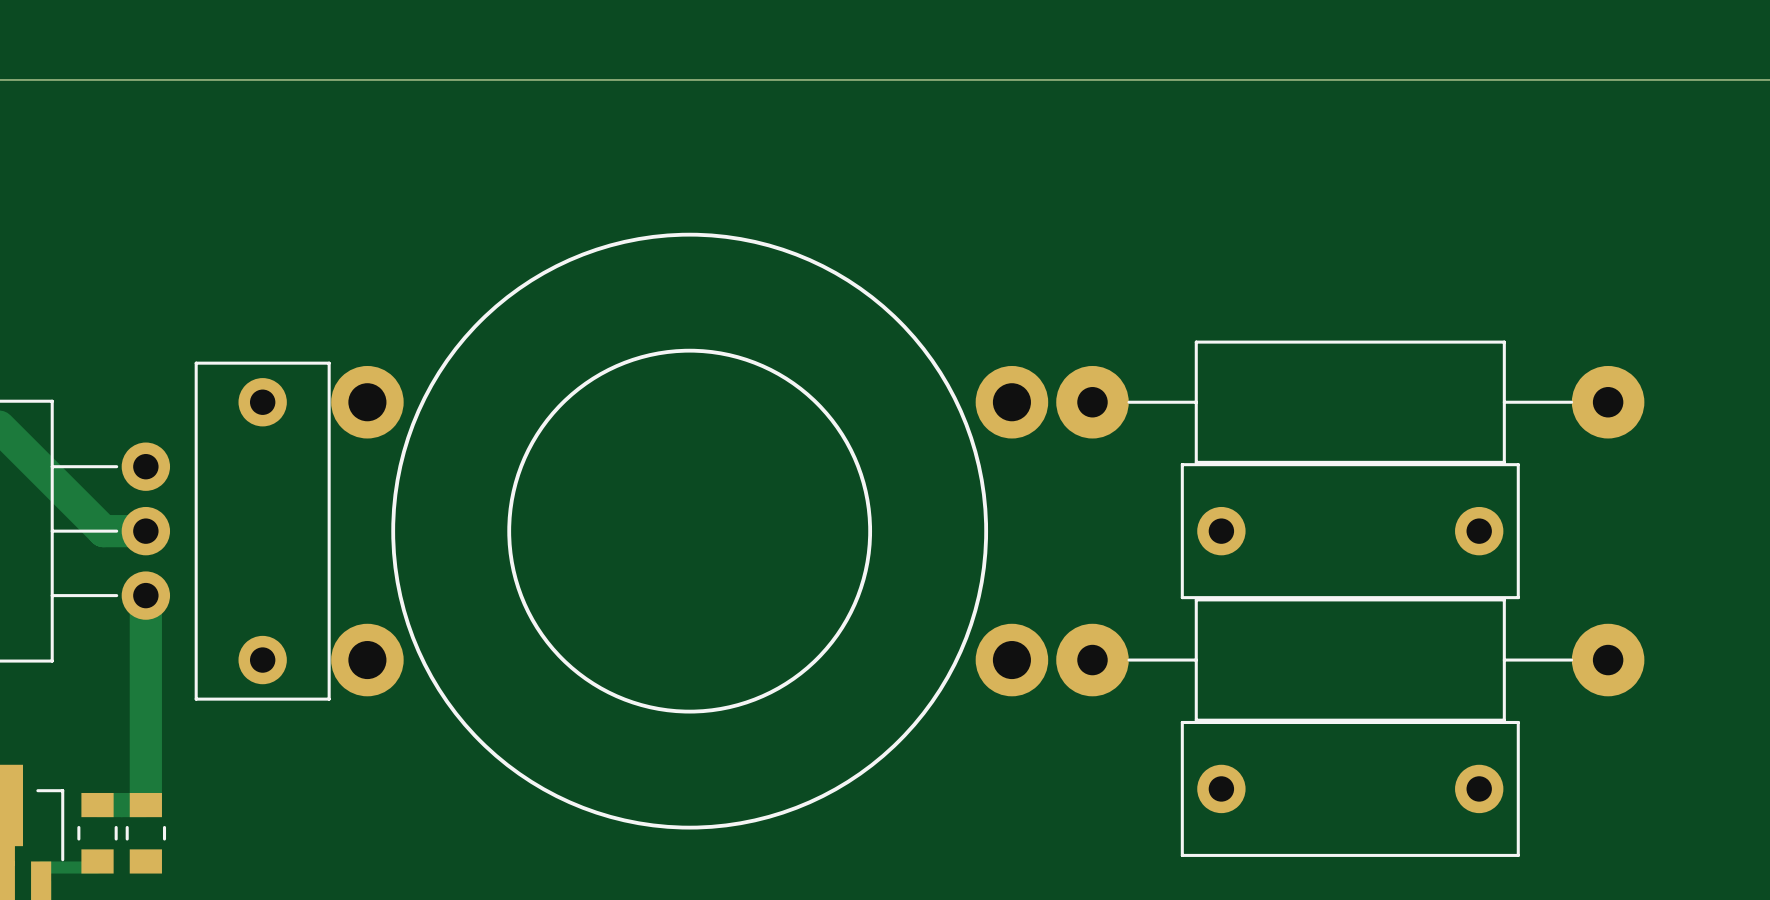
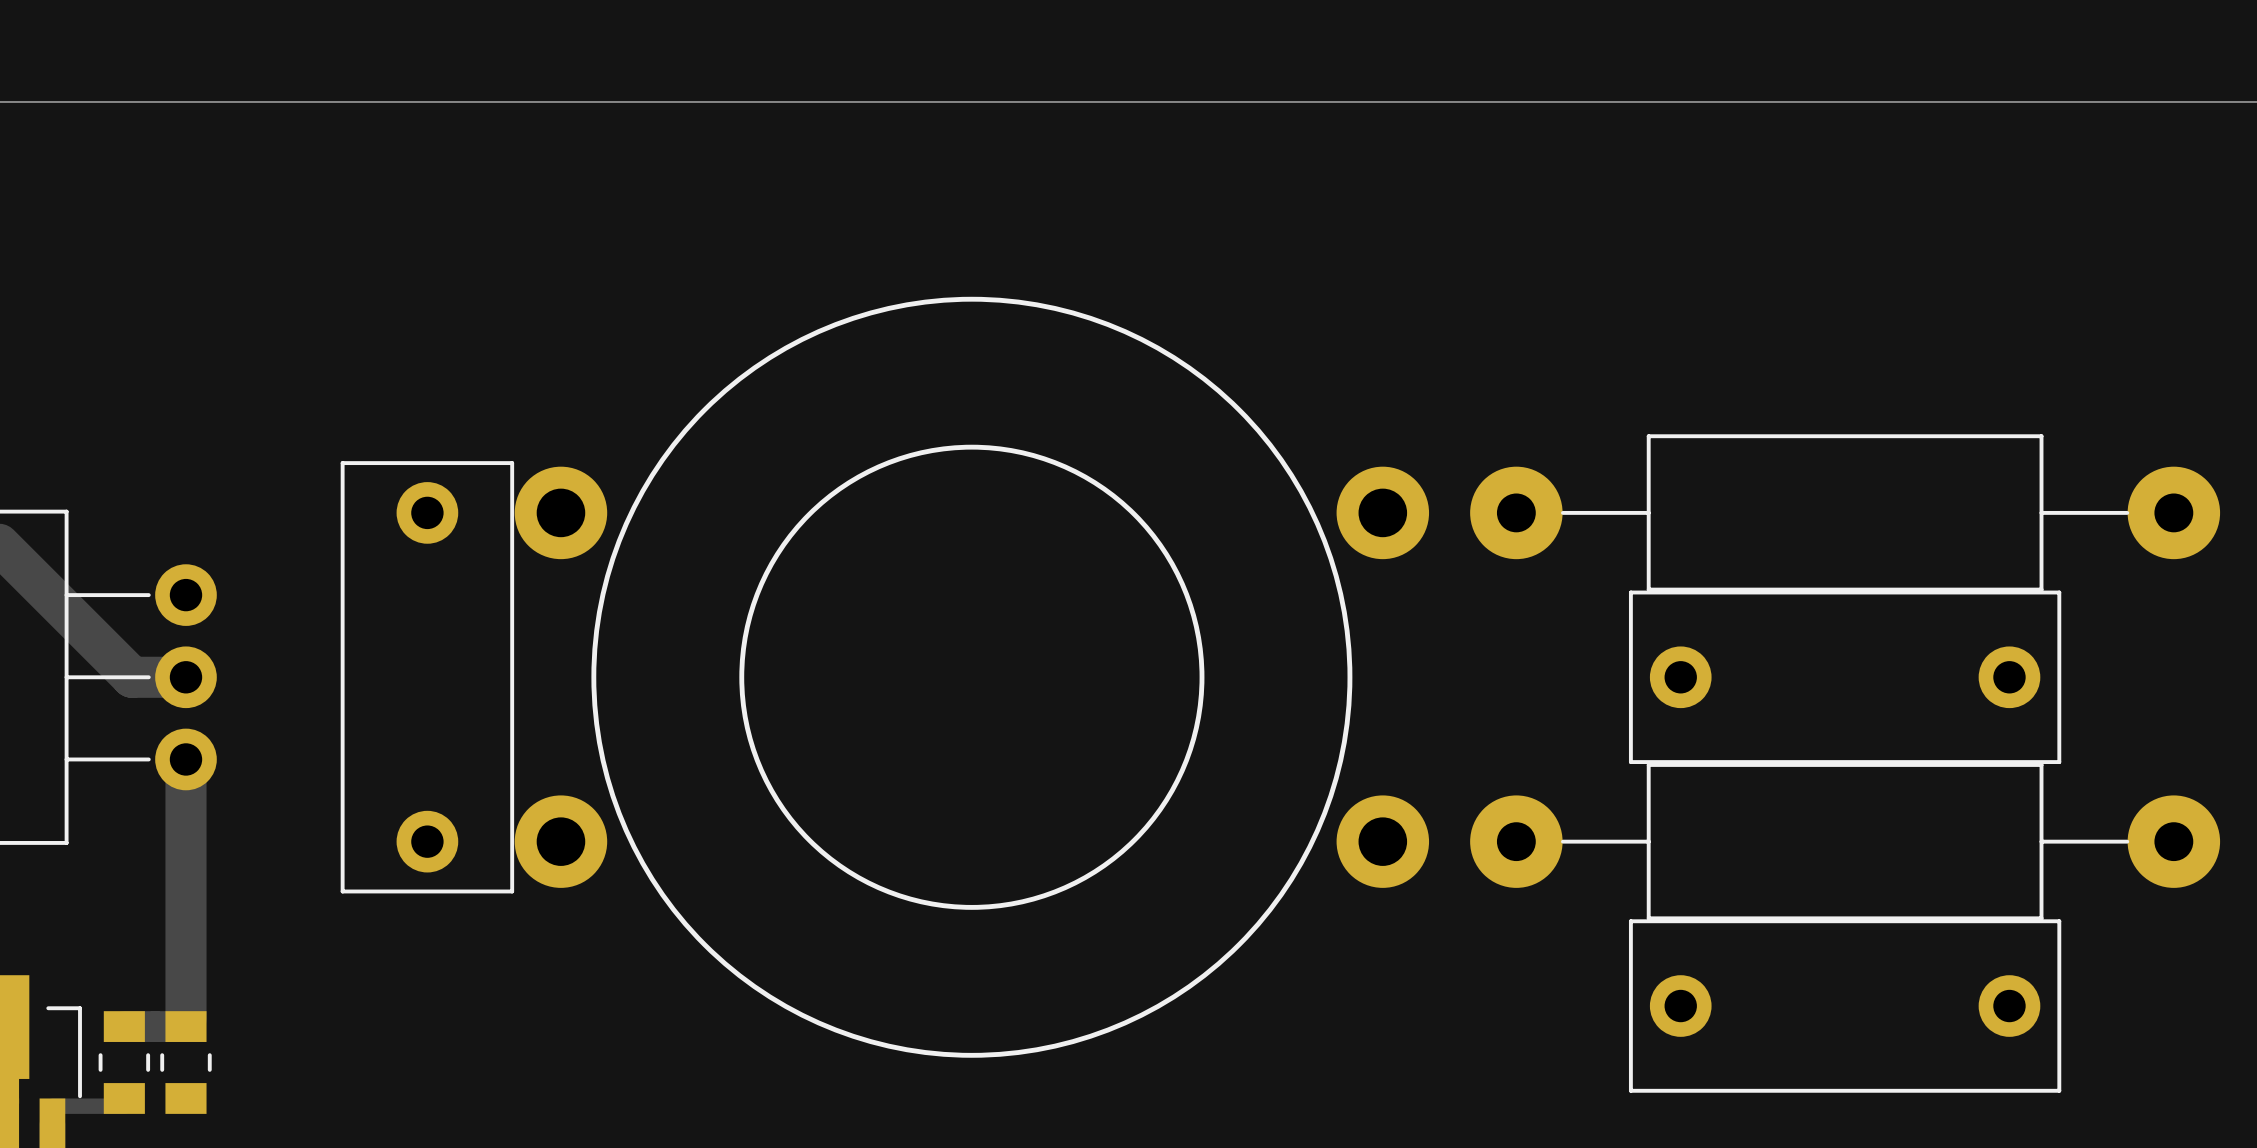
part position: (1350, 402) -> (1845, 512)
part position: (262, 531) -> (427, 677)
part position: (689, 531) -> (971, 677)
part position: (1350, 531) -> (1845, 677)
part position: (1350, 660) -> (1845, 841)
part position: (1350, 788) -> (1845, 1006)

